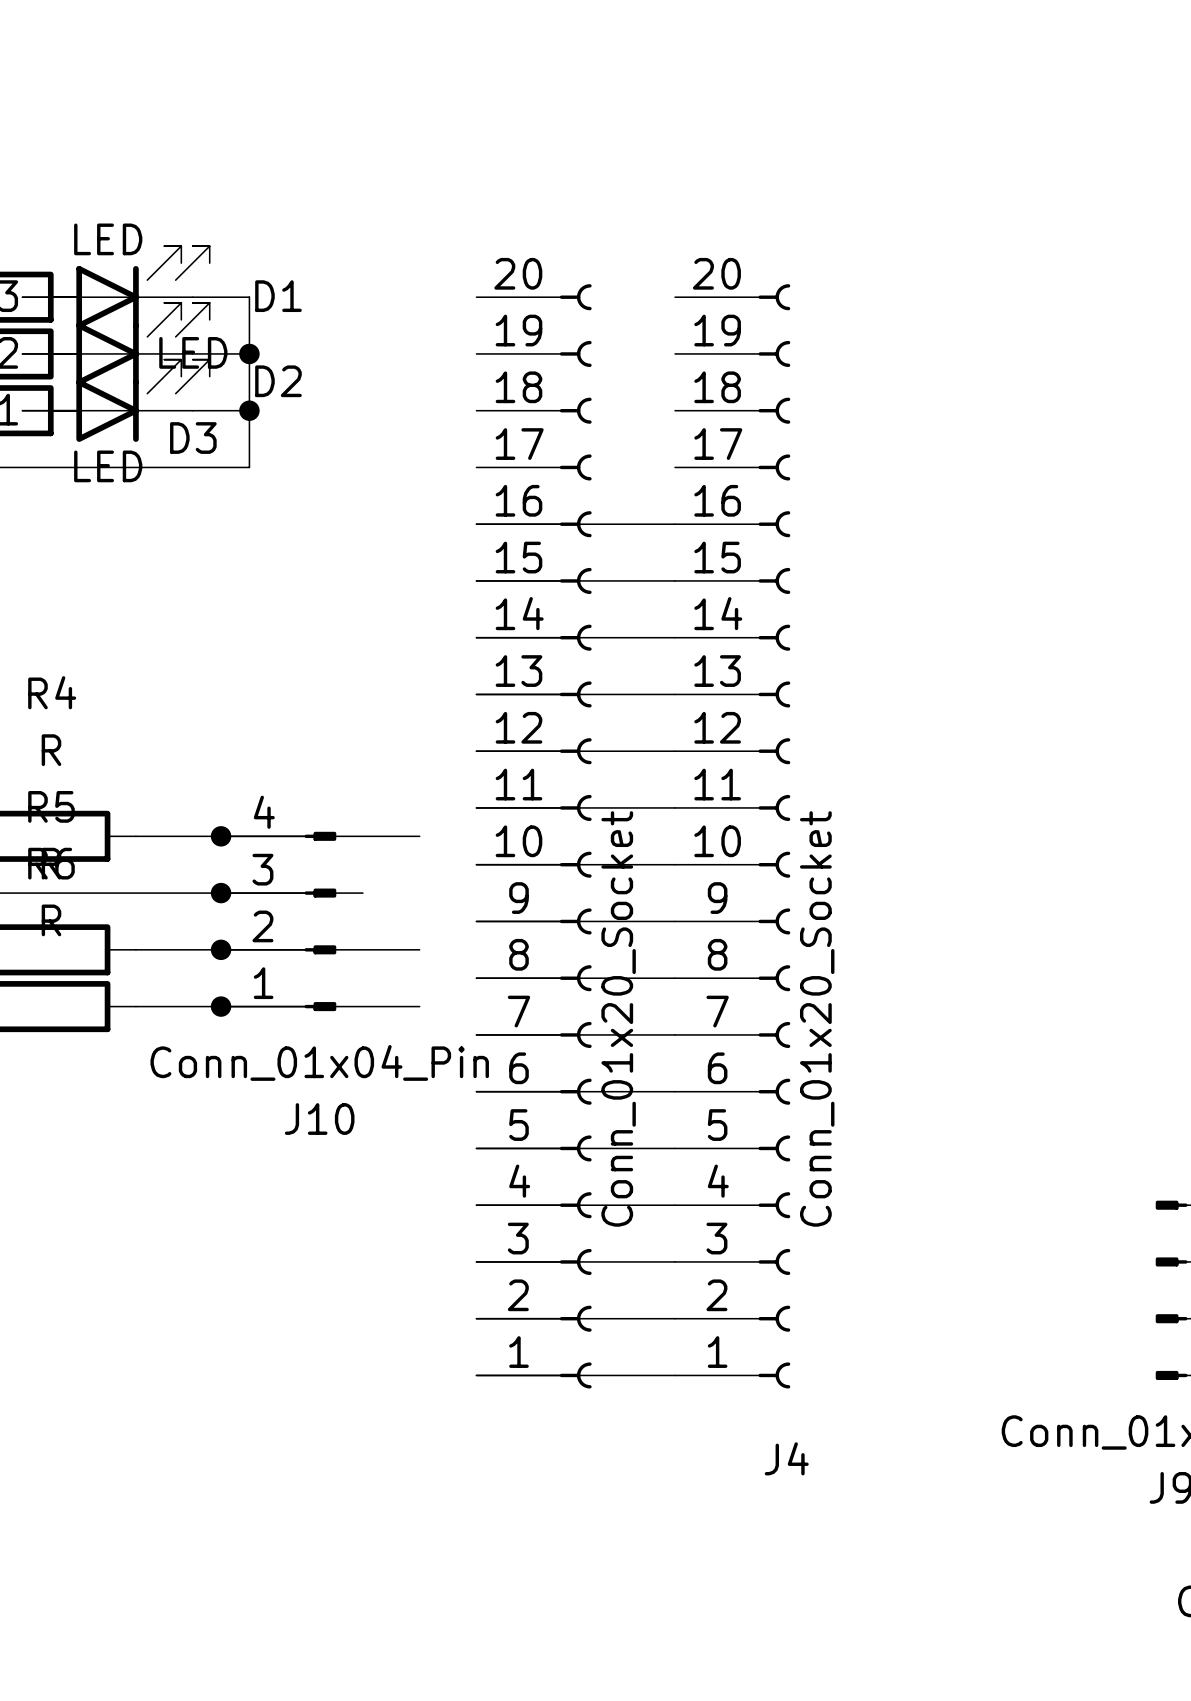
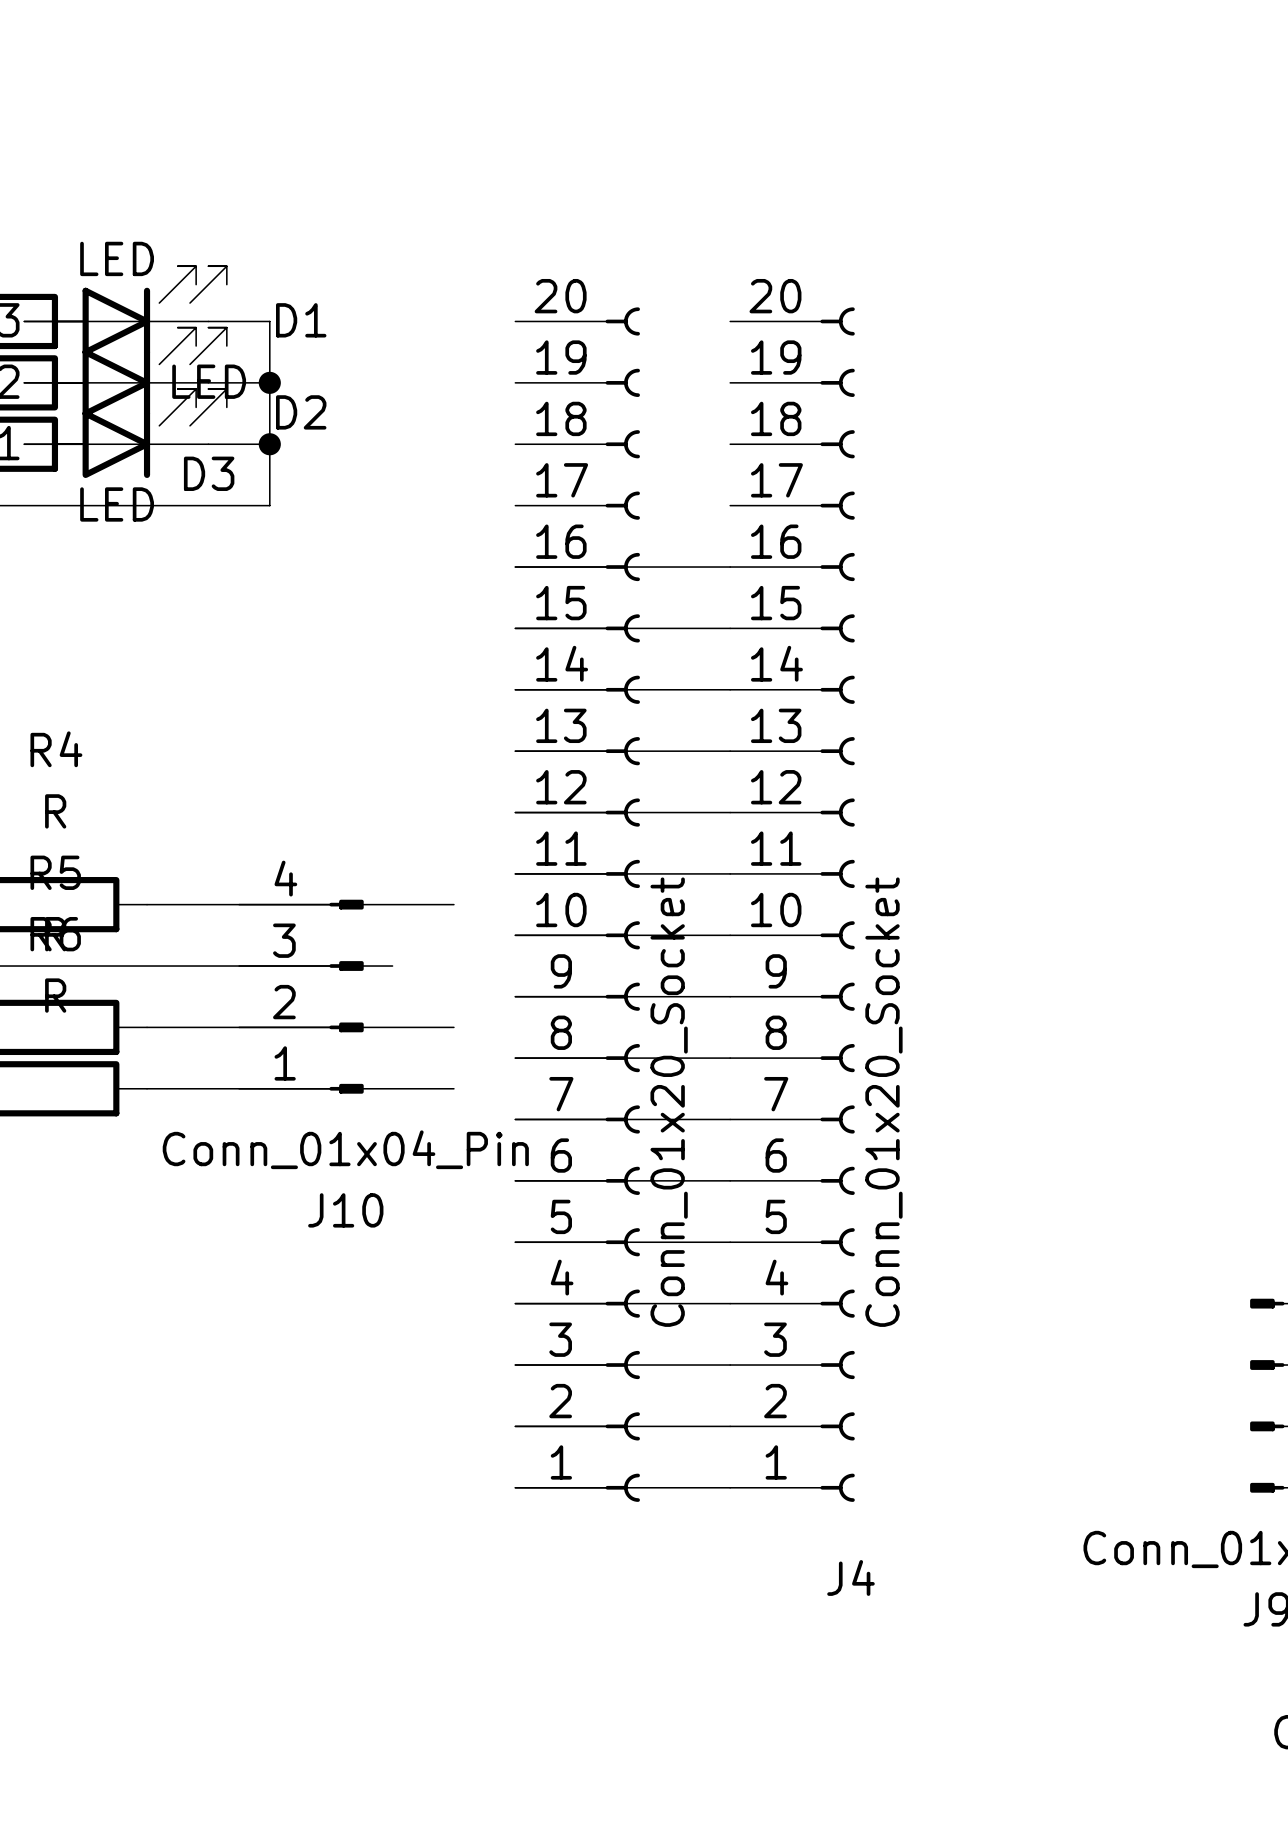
junction: (221, 836) -> none
junction: (221, 893) -> none
junction: (221, 949) -> none
junction: (221, 1006) -> none

